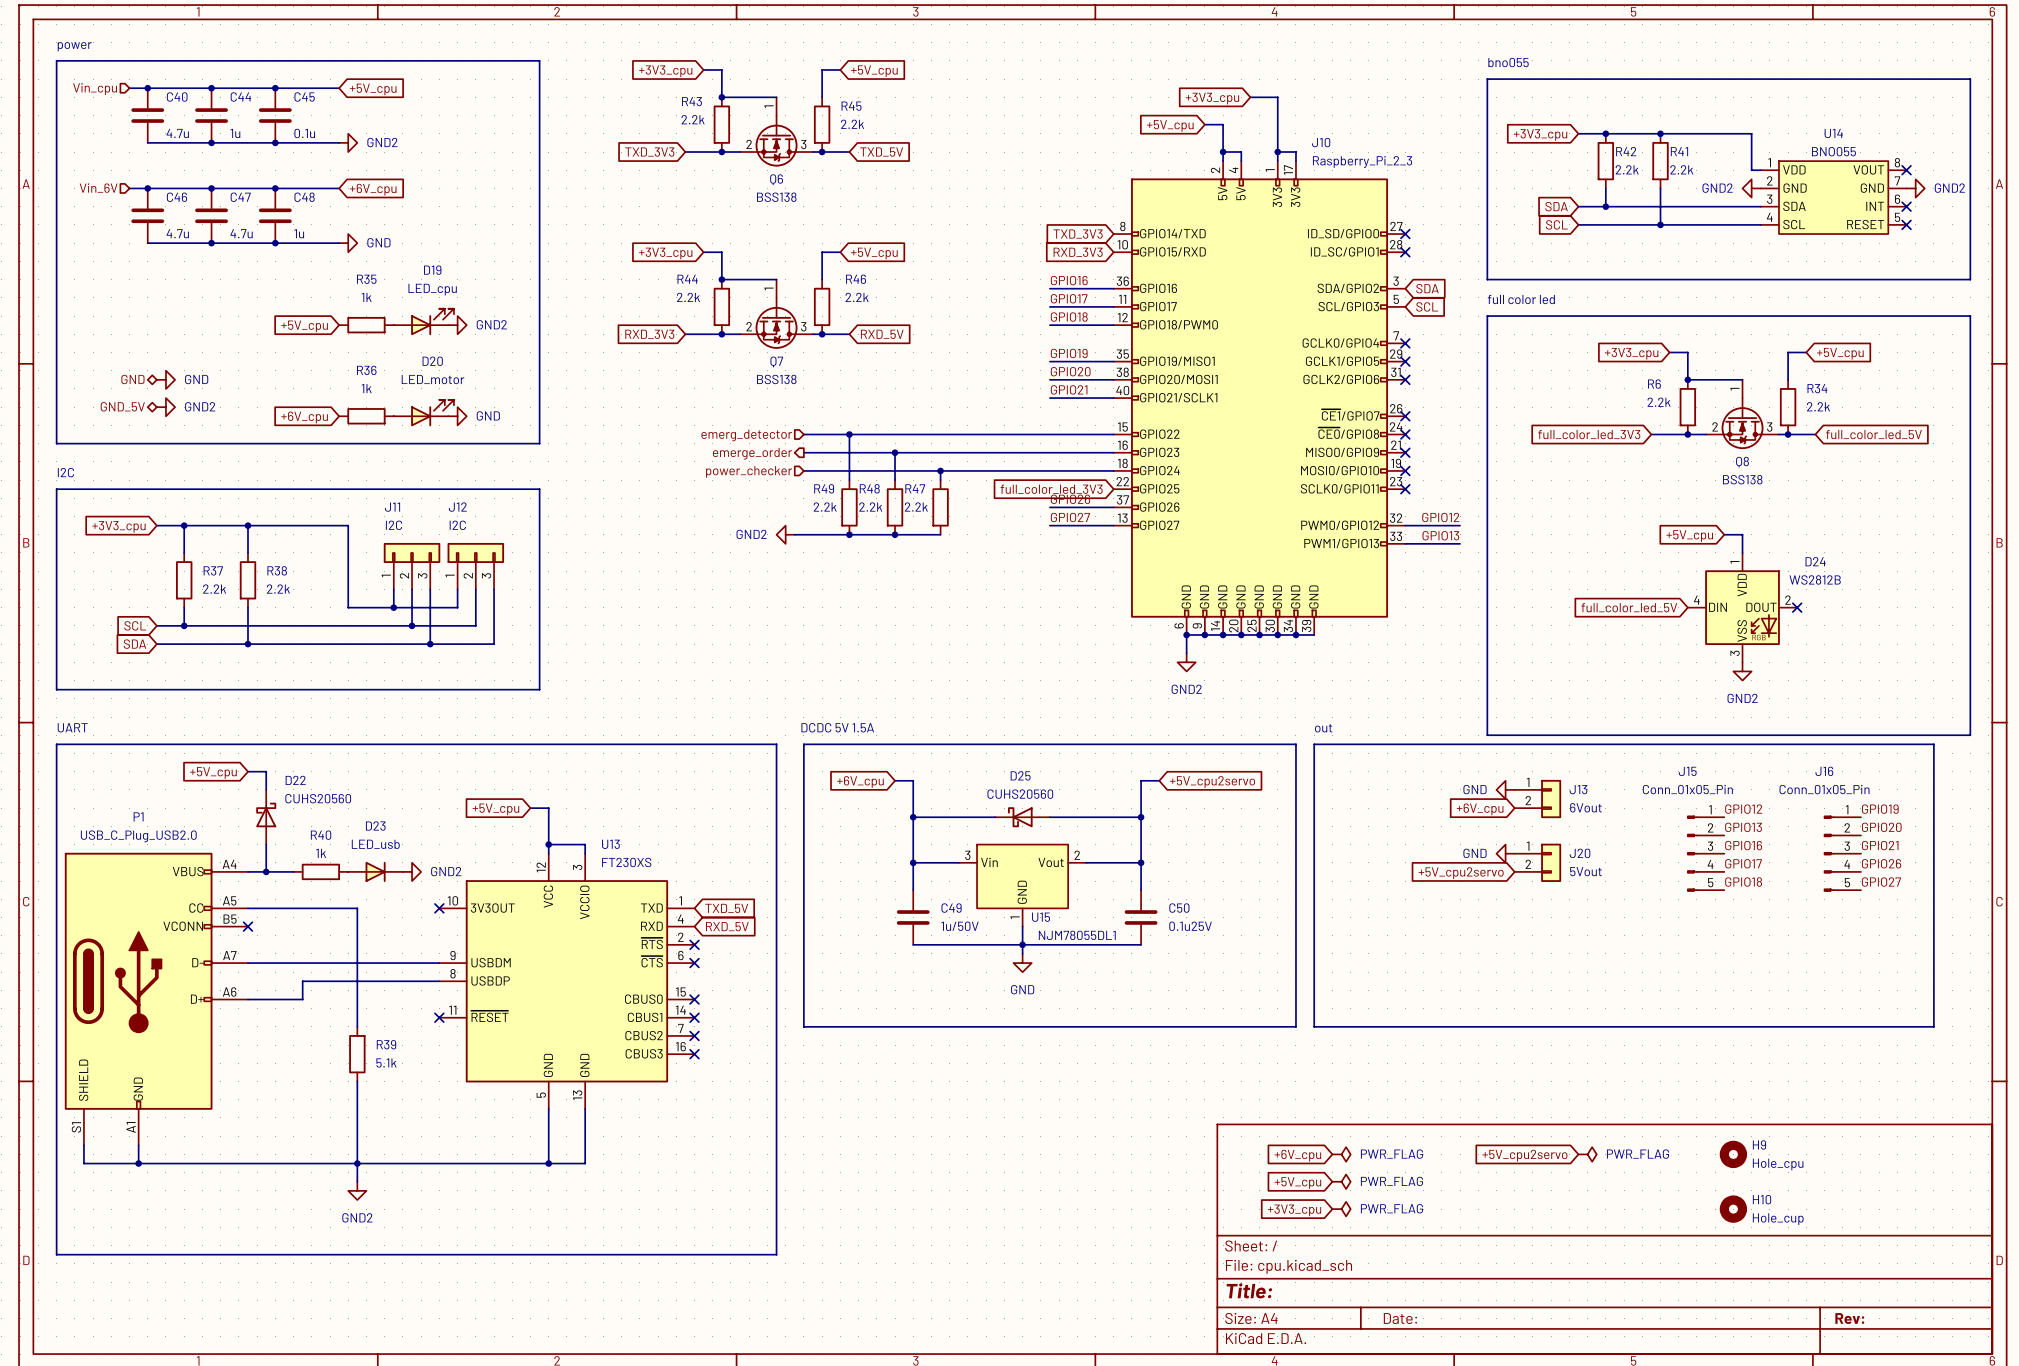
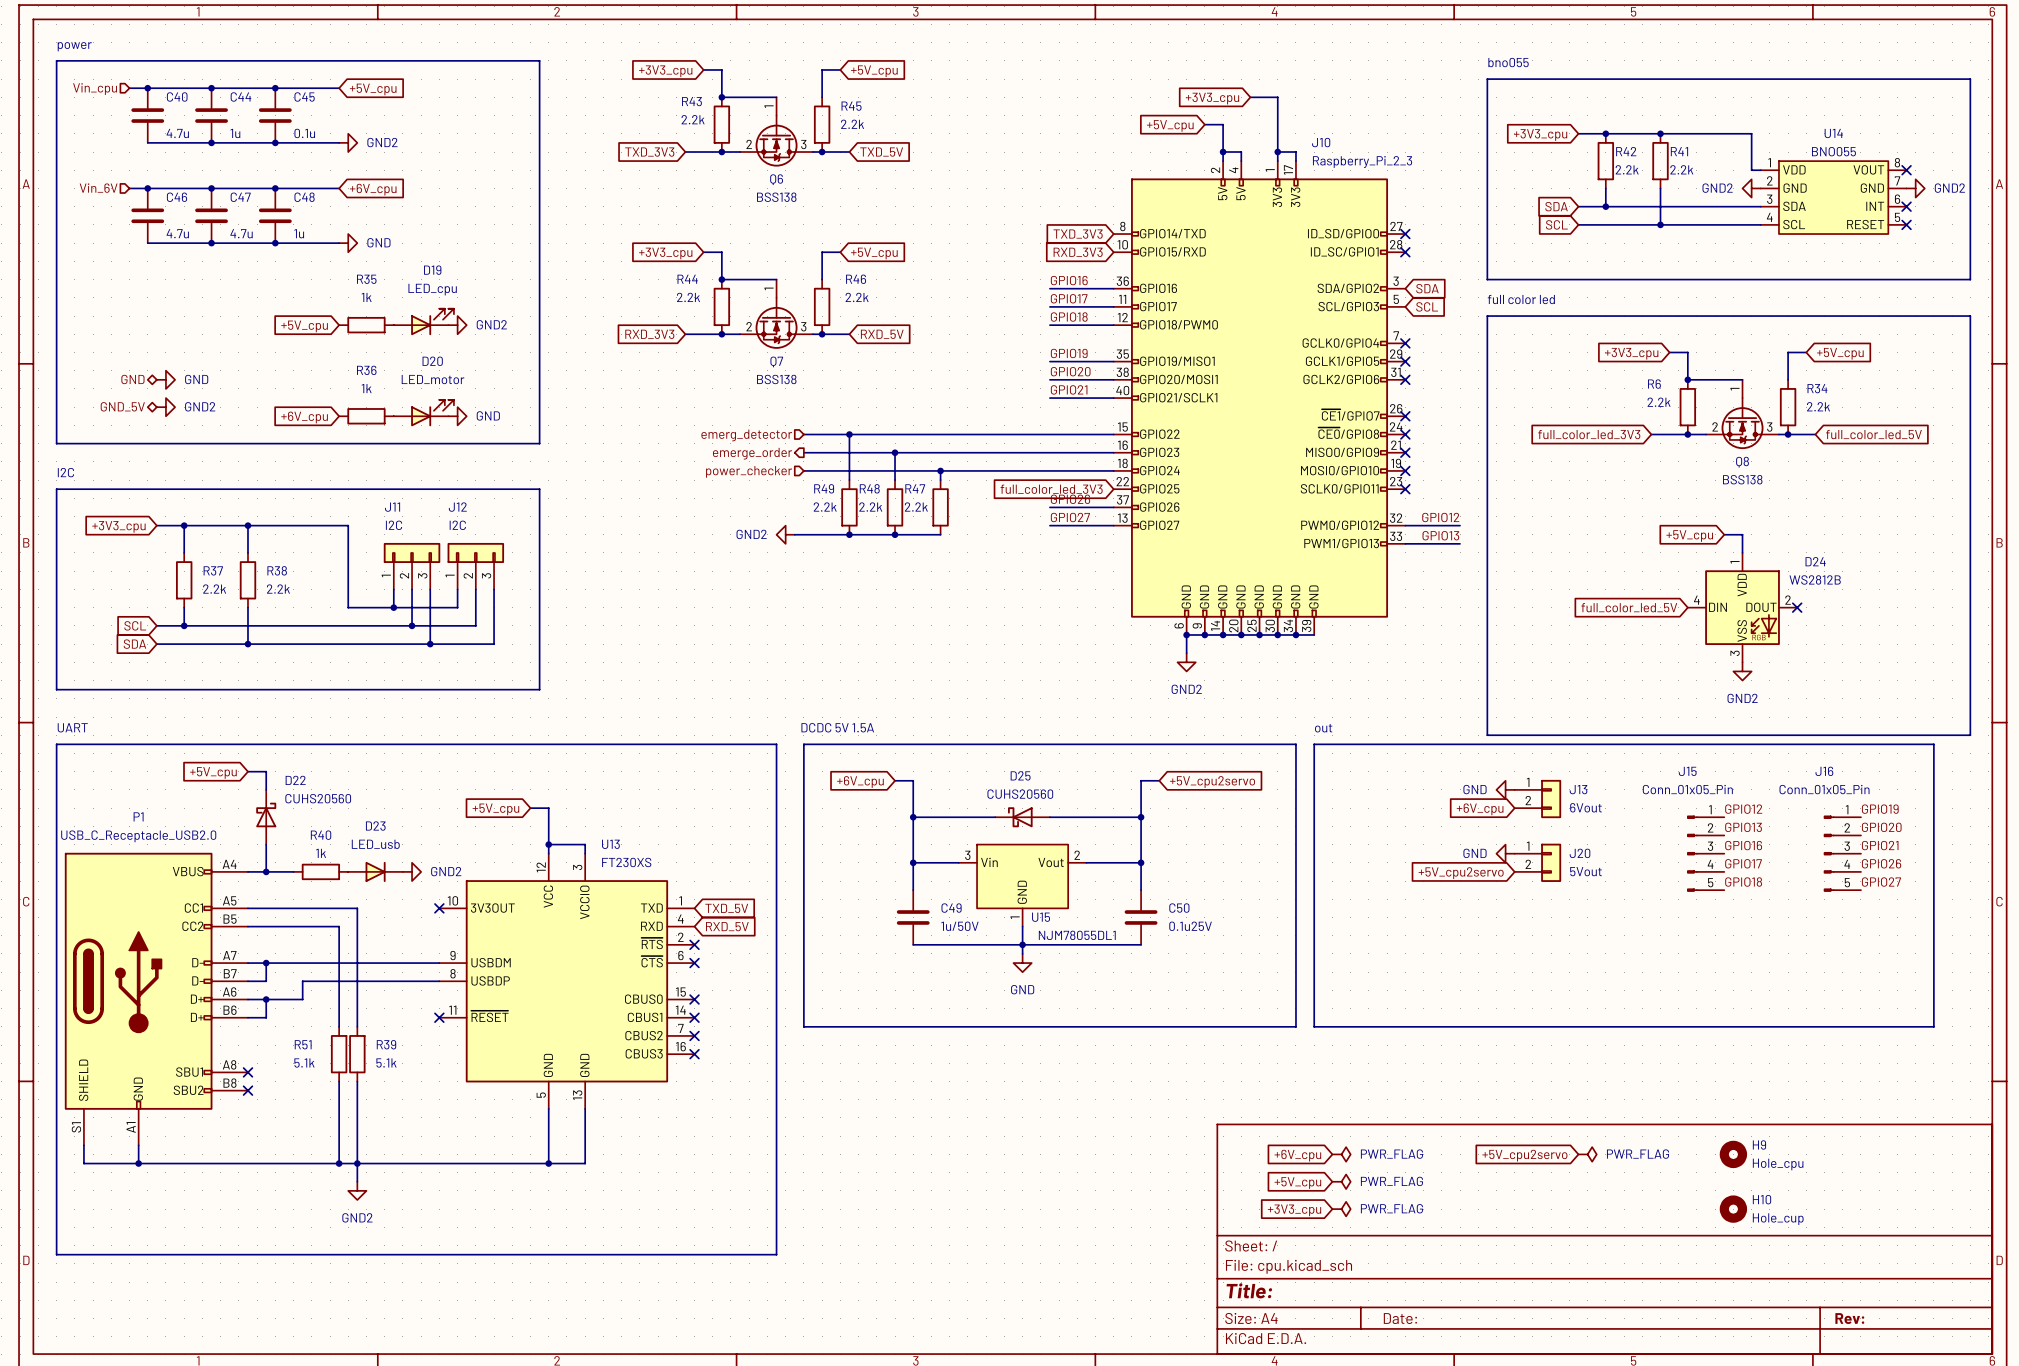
P1 value: USB_C_Plug_USB2.0 (138, 836) -> USB_C_Receptacle_USB2.0 (138, 836)
P1 symbol: [64, 852, 248, 1146] -> [64, 852, 248, 1146]
wire: none -> (247, 926) (339, 926) (339, 1026)
no-connect mark: (247, 926) -> none
wire: none -> (266, 963) (266, 981) (247, 981)
junction: none -> (266, 963)
wire: none -> (266, 999) (266, 1017) (247, 1017)
junction: none -> (266, 999)
R51: none -> 5.1k (339, 1054)
no-connect mark: none -> (247, 1072)
wire: none -> (339, 1081) (339, 1163)
no-connect mark: none -> (247, 1090)
junction: none -> (339, 1163)

